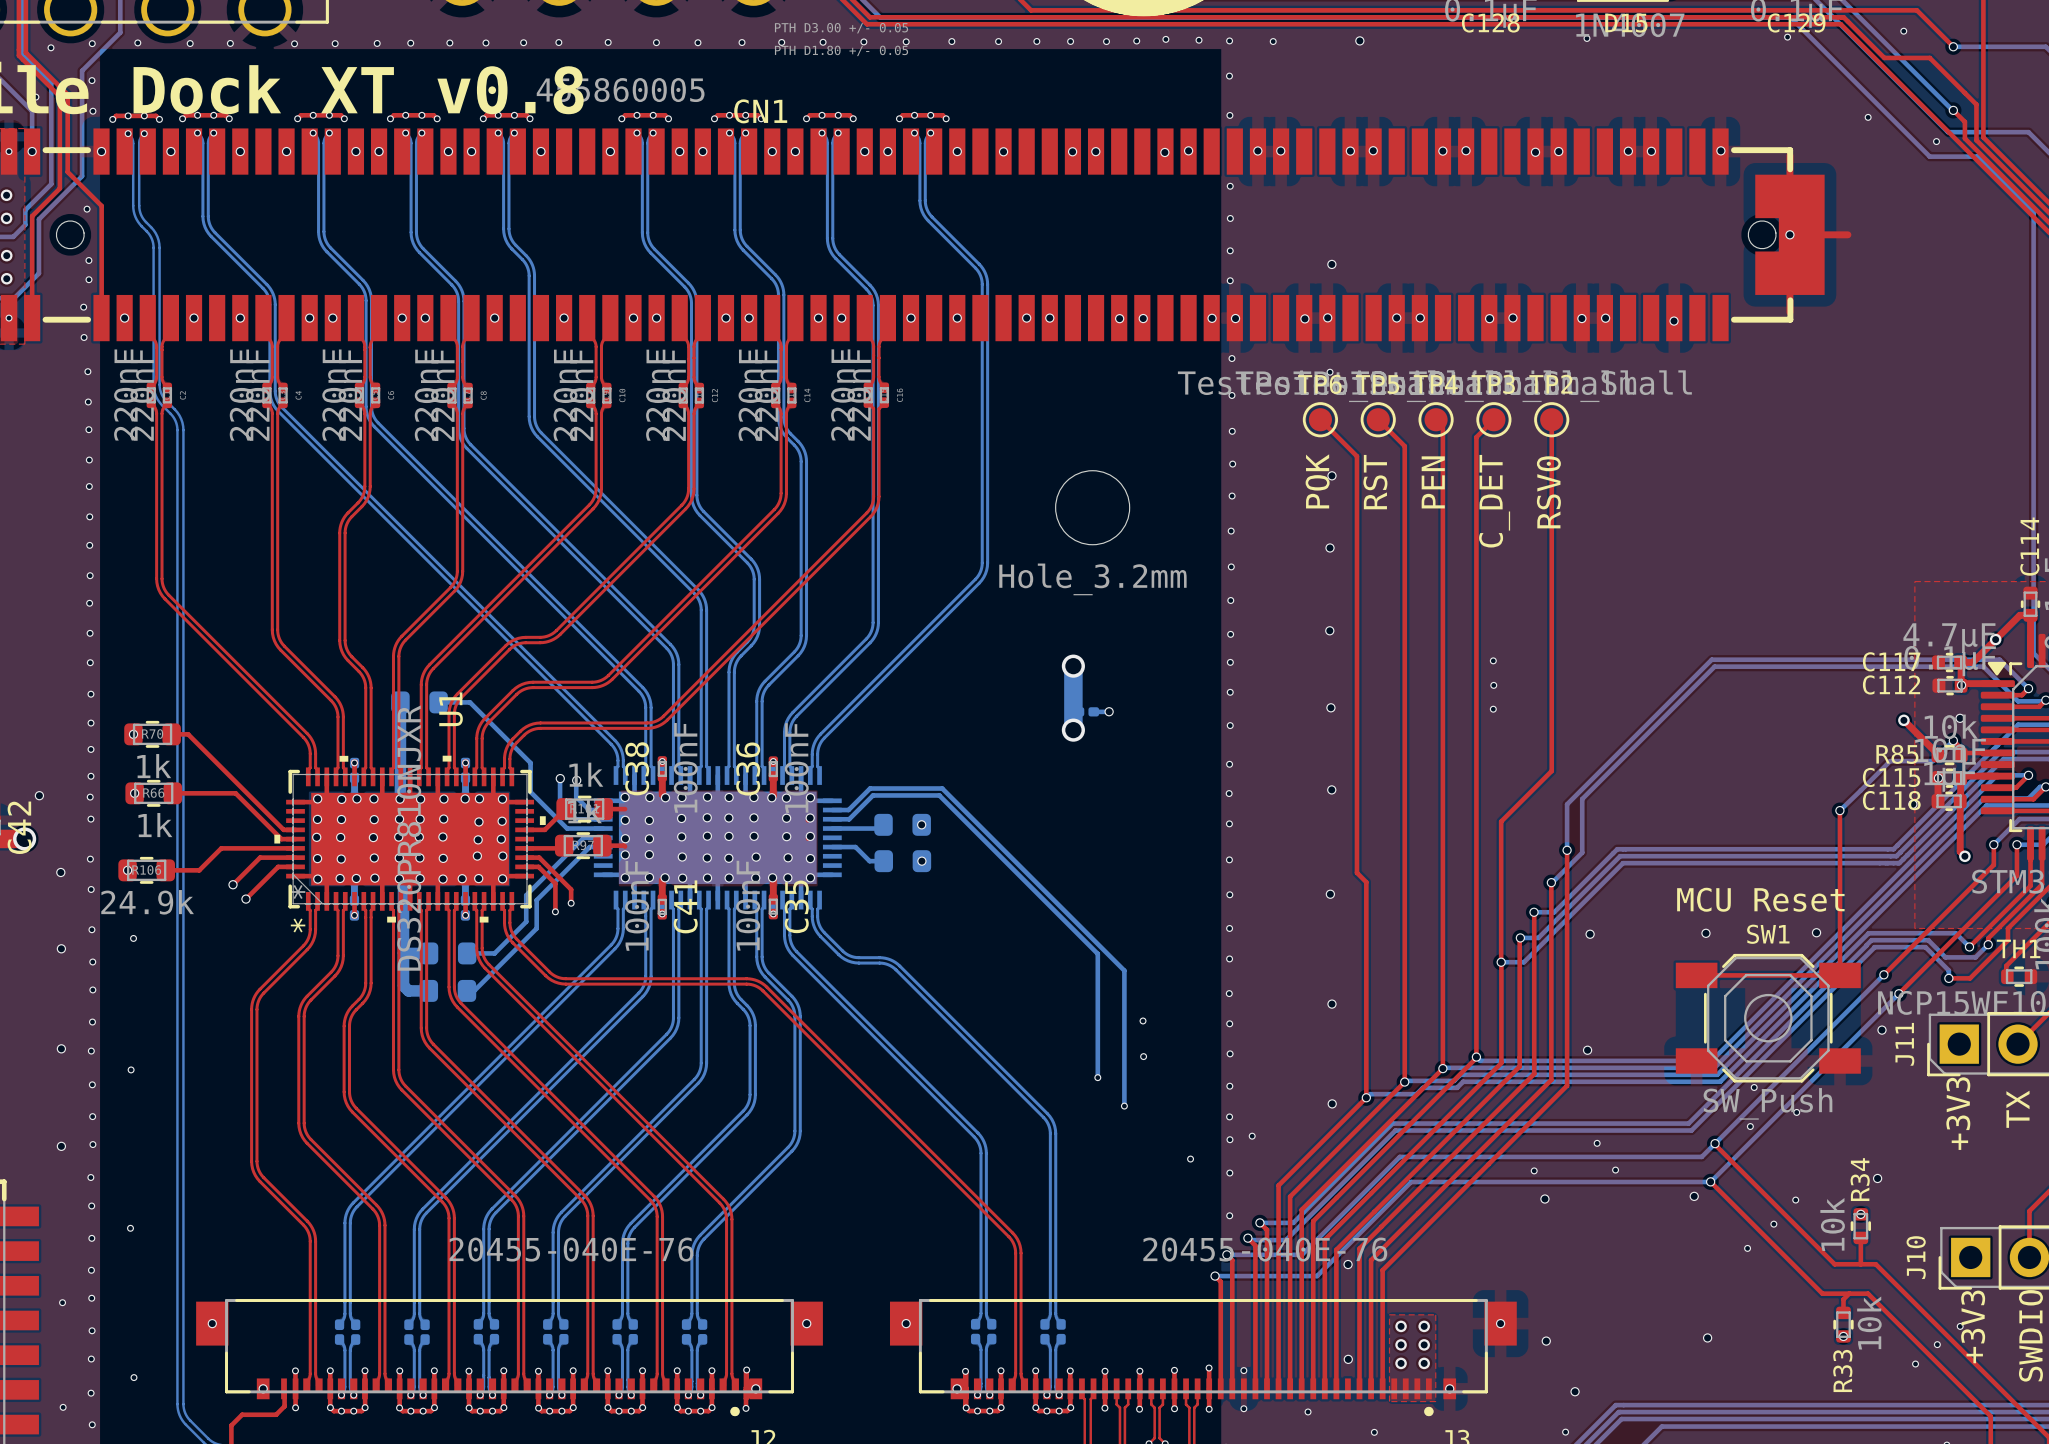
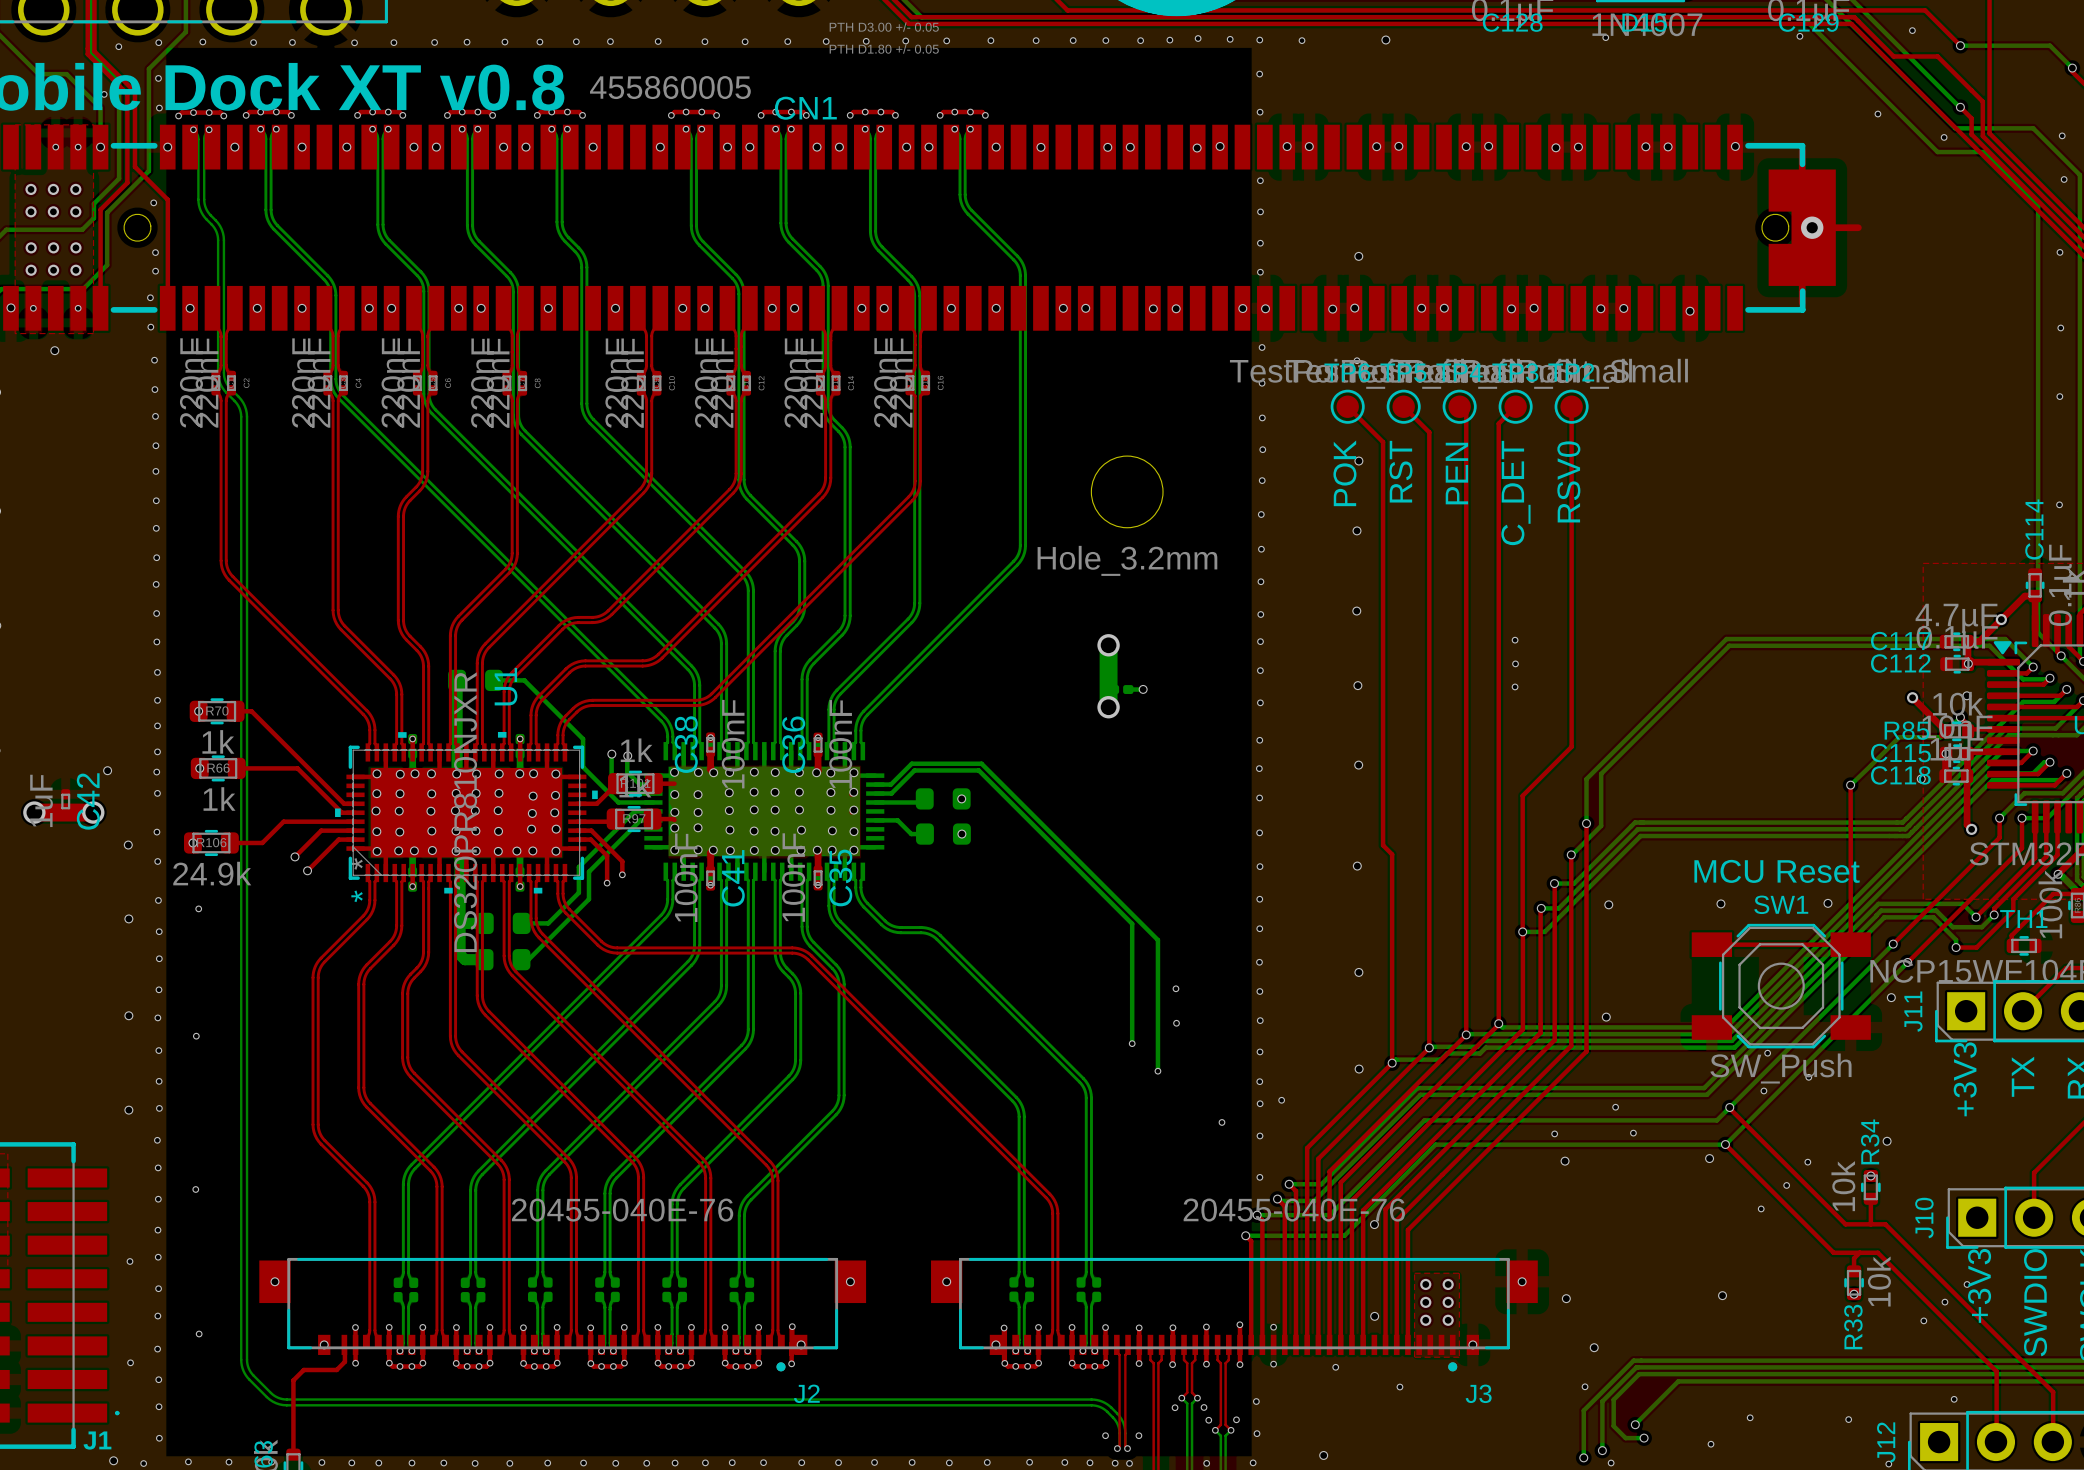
via size: [1785, 230, 1795, 240] -> [1801, 216, 1824, 239]

